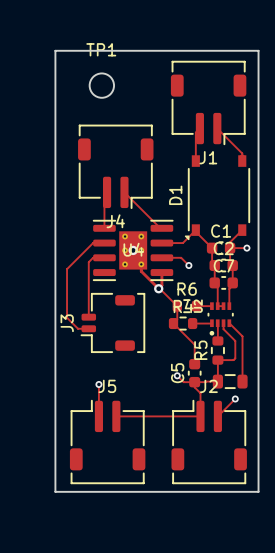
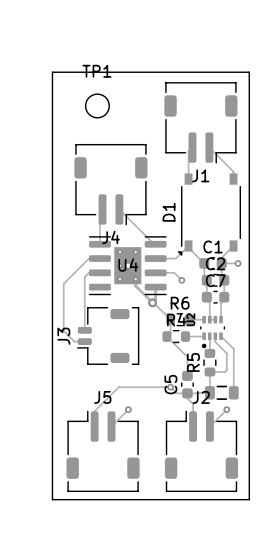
track: (98, 384) (98, 400) -> (170, 387) (118, 387) (94, 411)
via position: (98, 384) -> (128, 409)
track: (116, 416) (200, 416) -> (111, 426) (128, 409)

